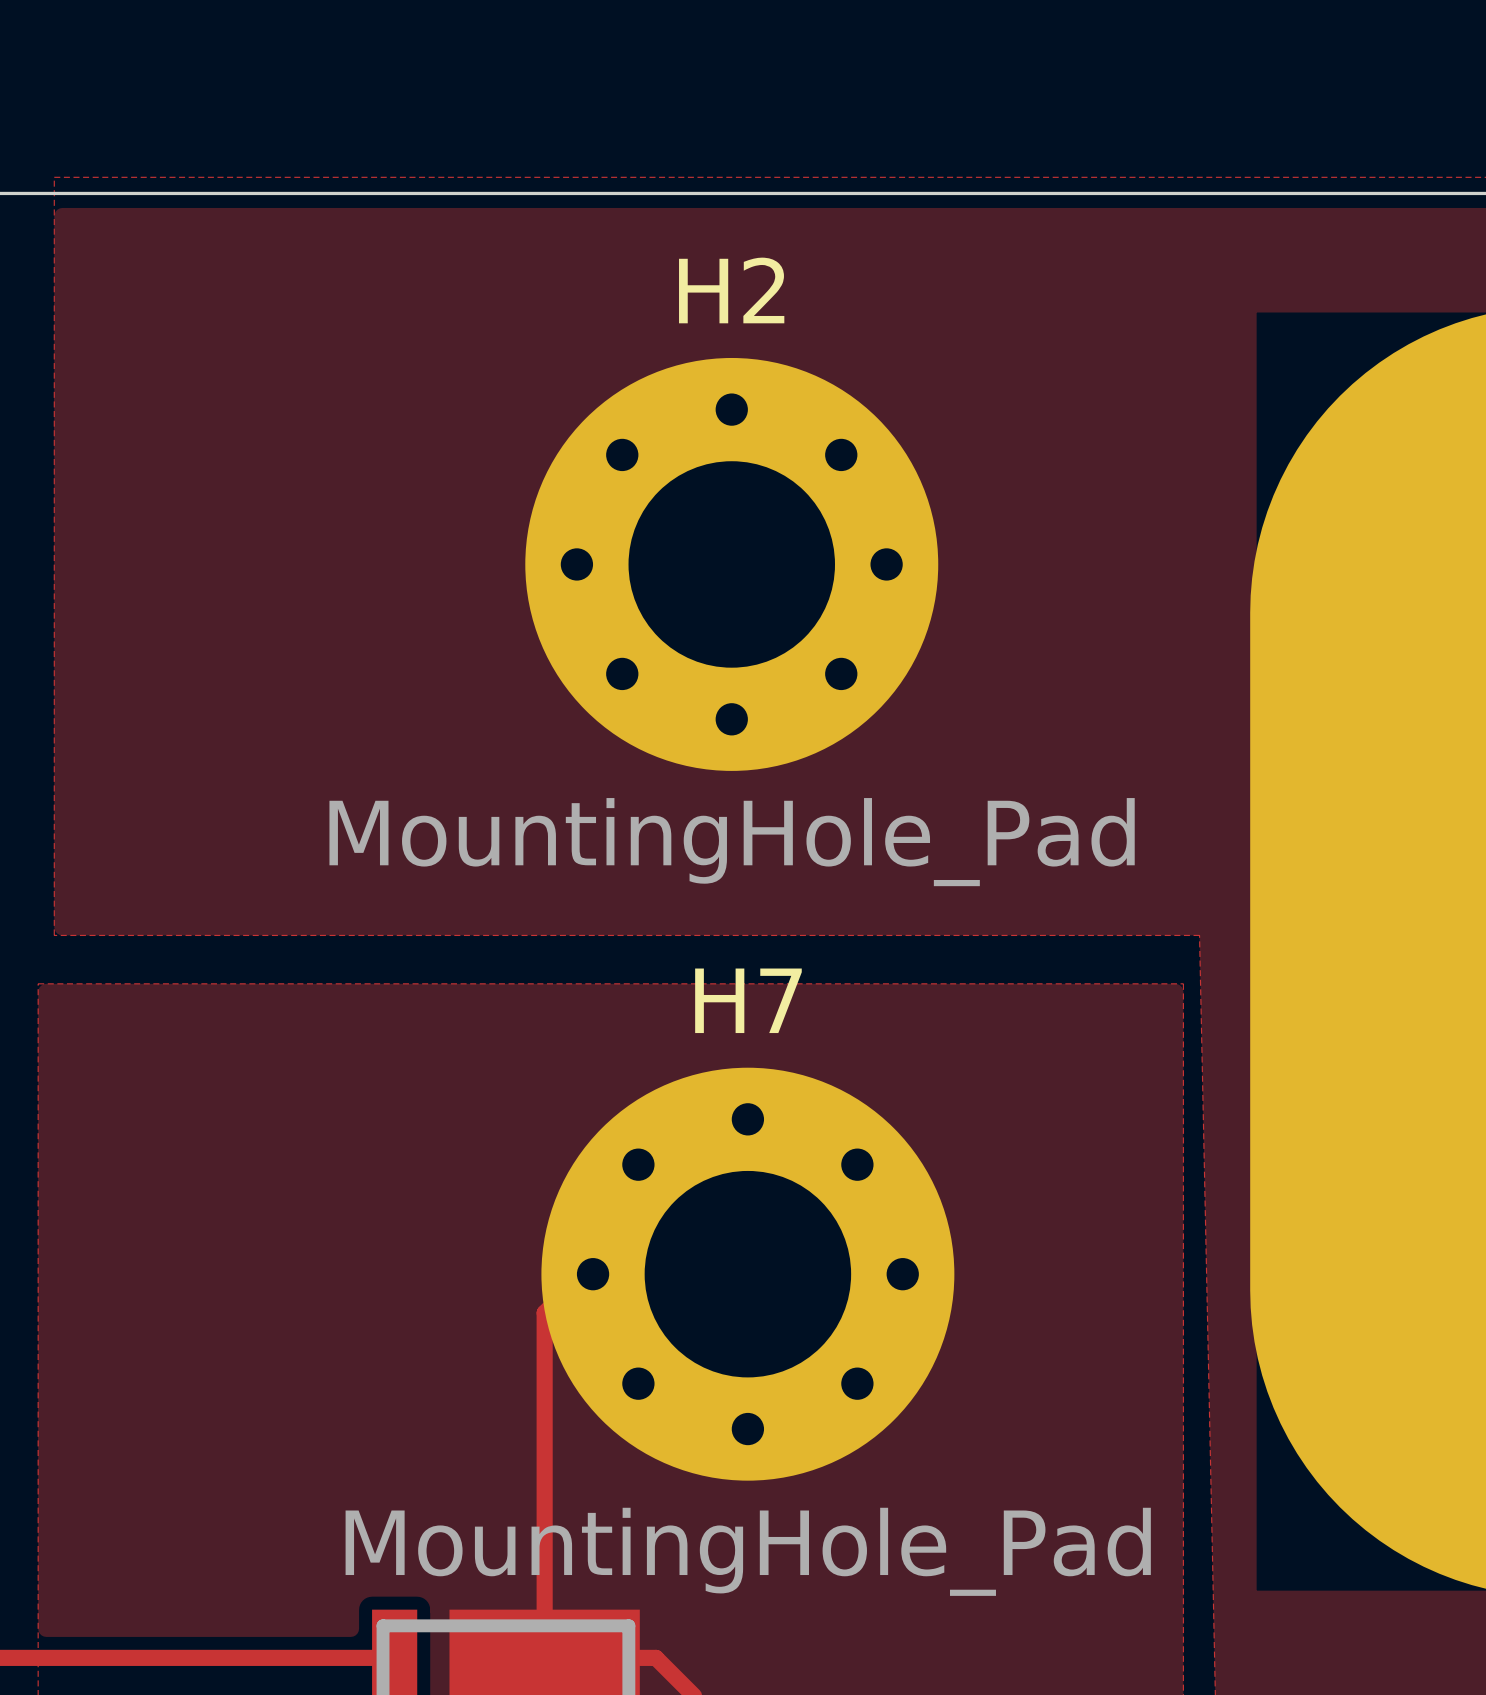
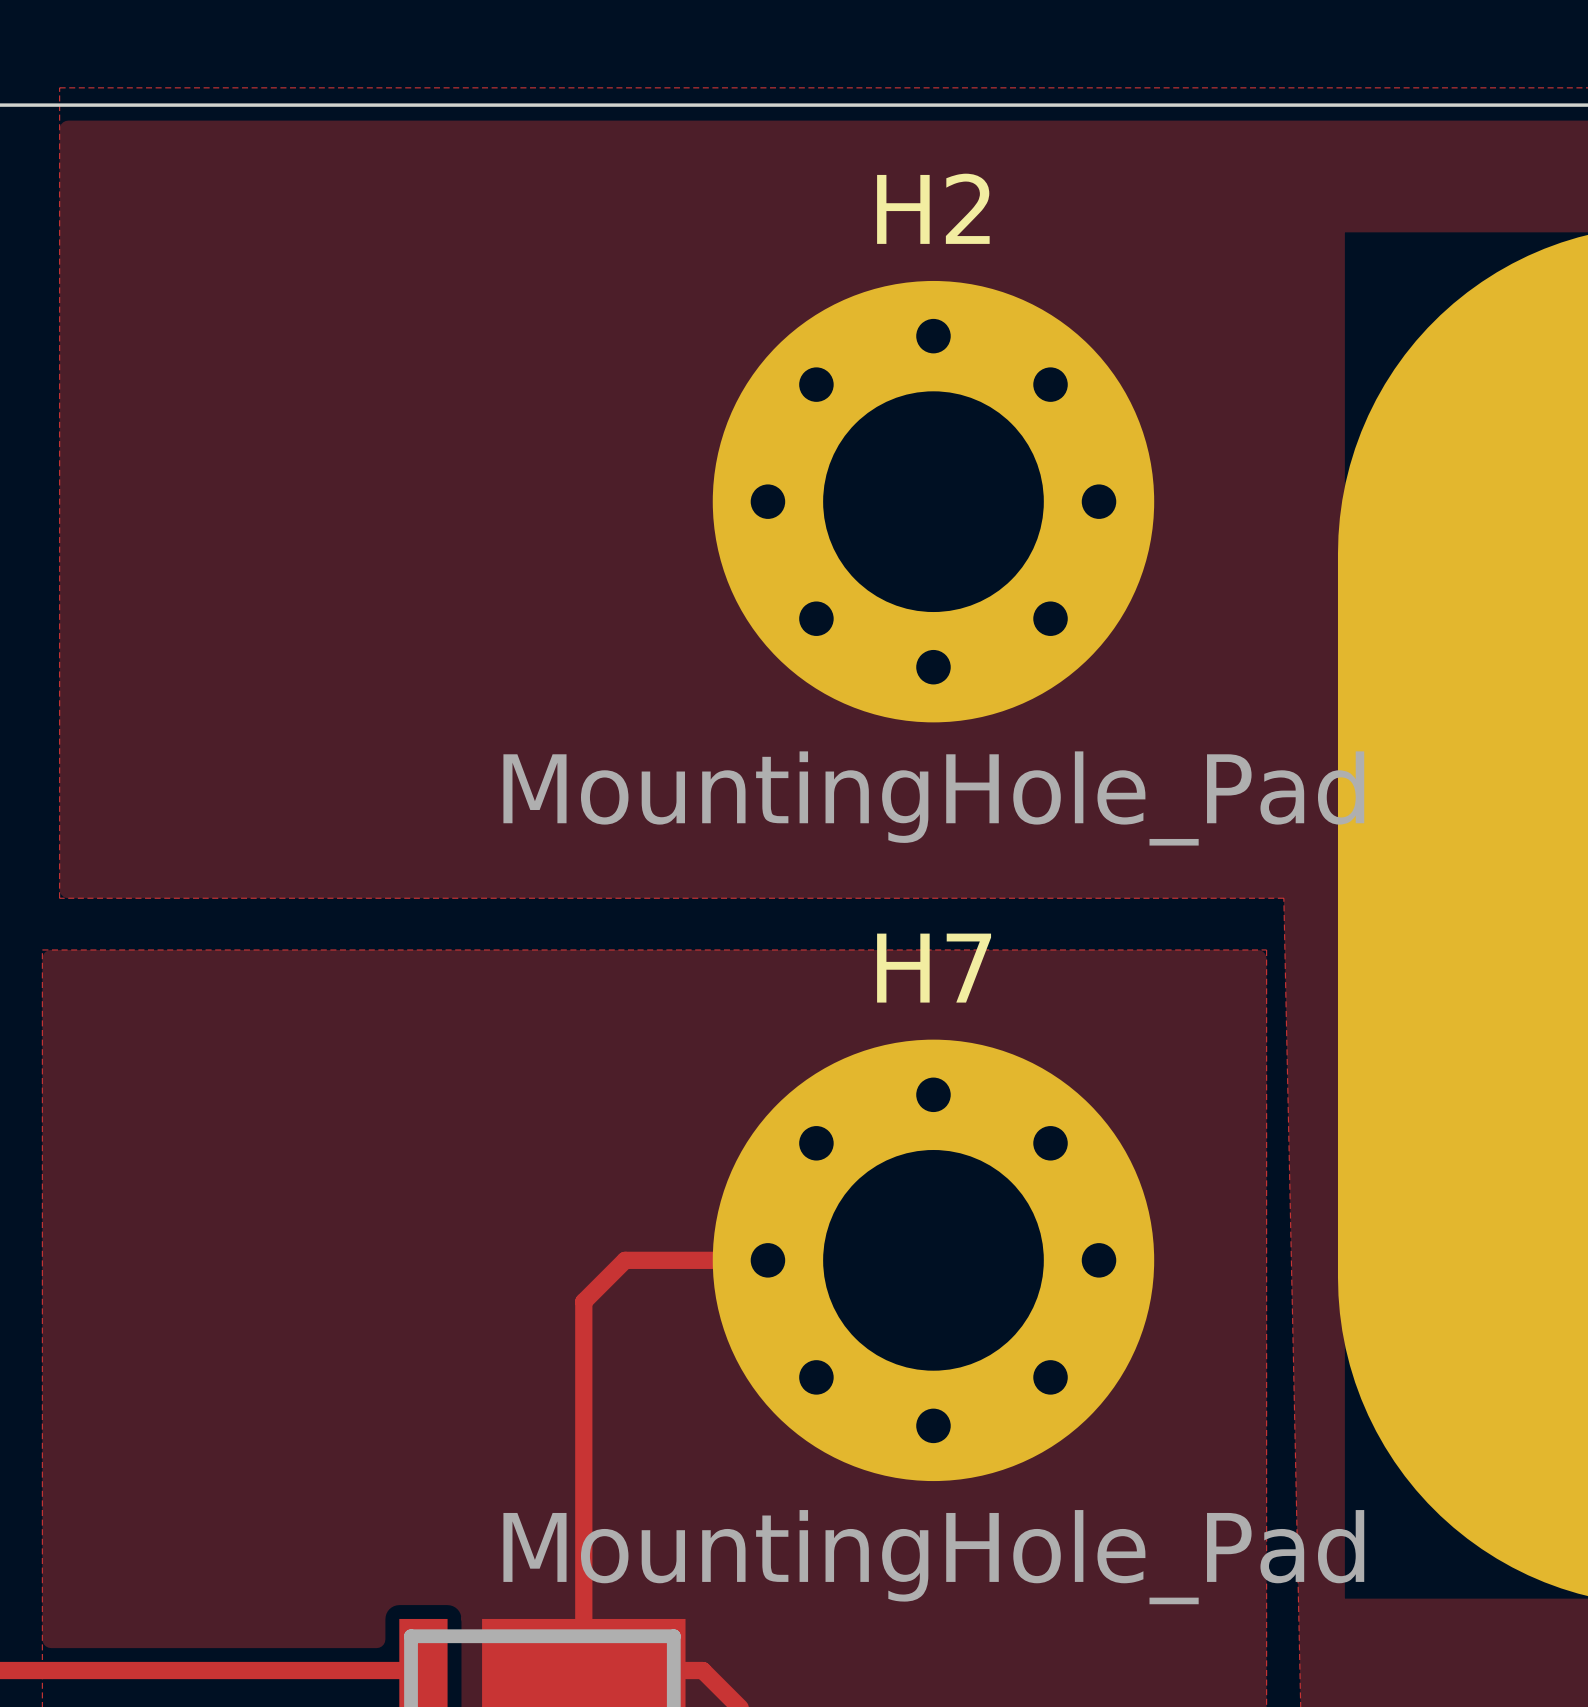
H2 position: (731, 564) -> (933, 501)
H7 position: (747, 1274) -> (933, 1260)

